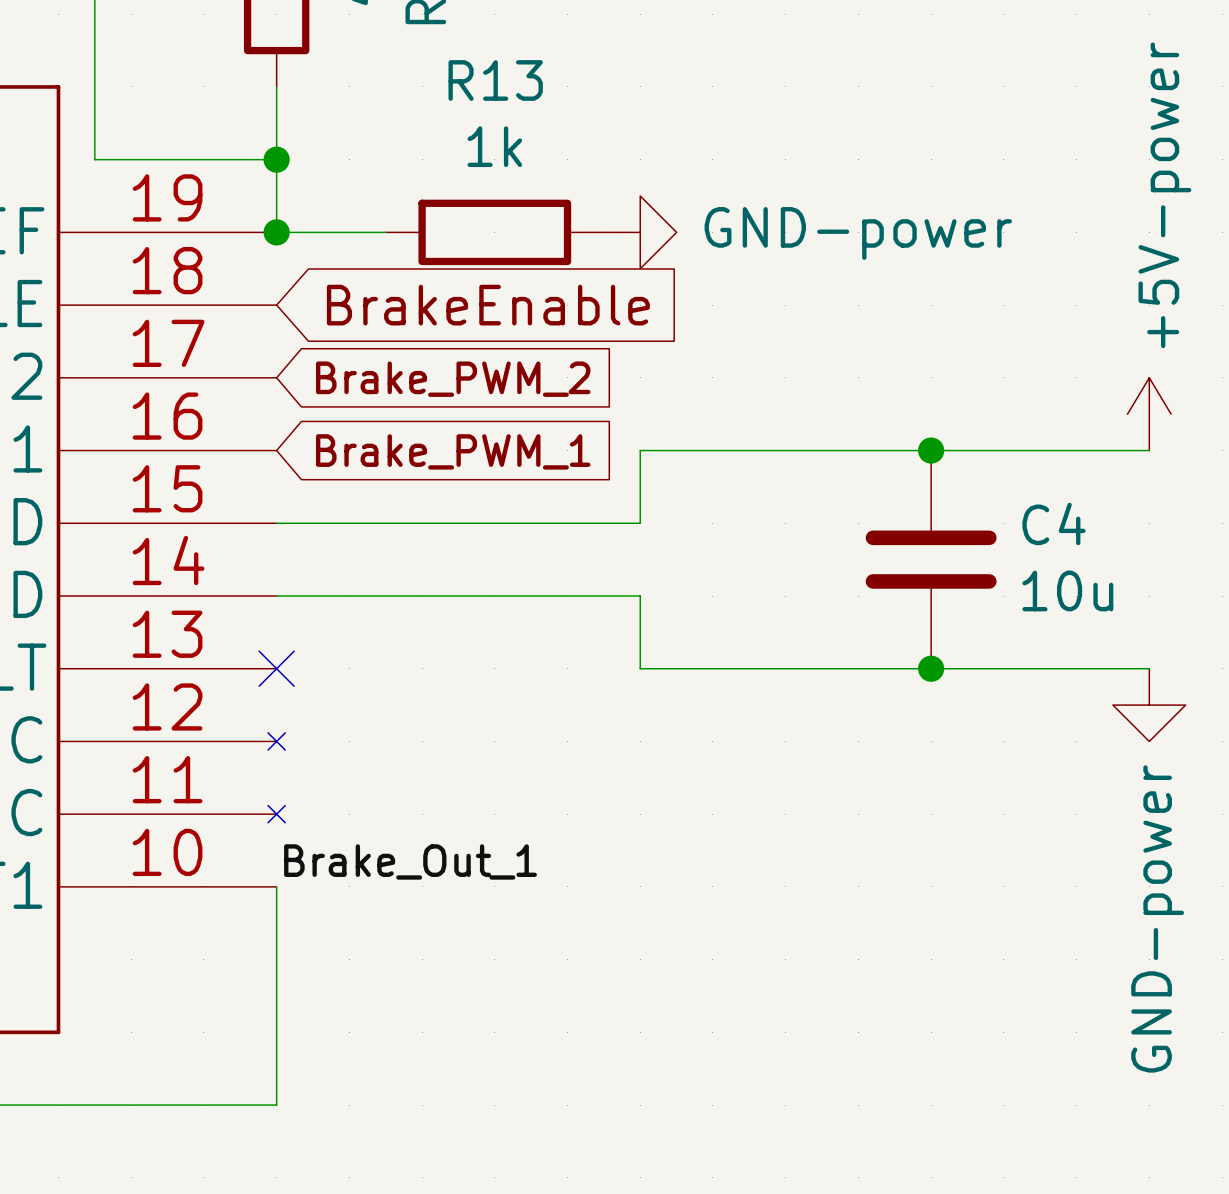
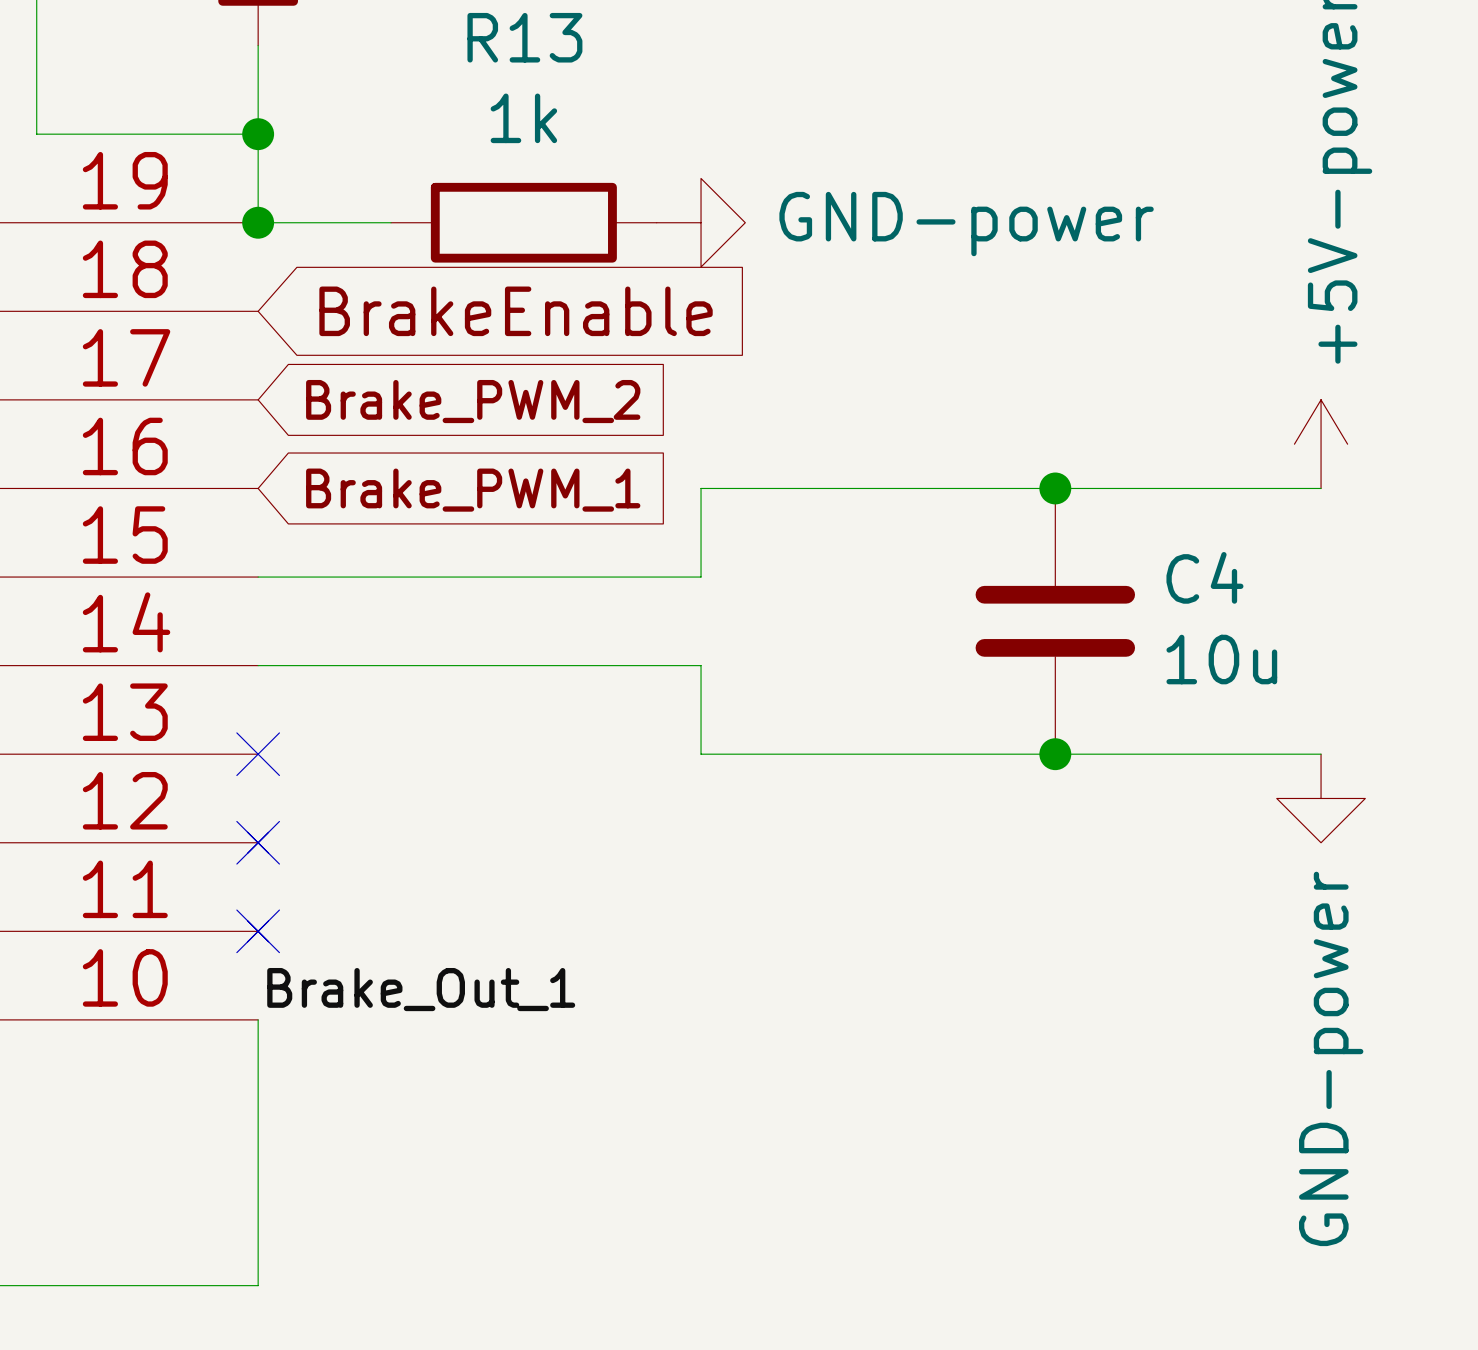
no-connect mark: none -> (258, 842)
no-connect mark: none -> (258, 931)

